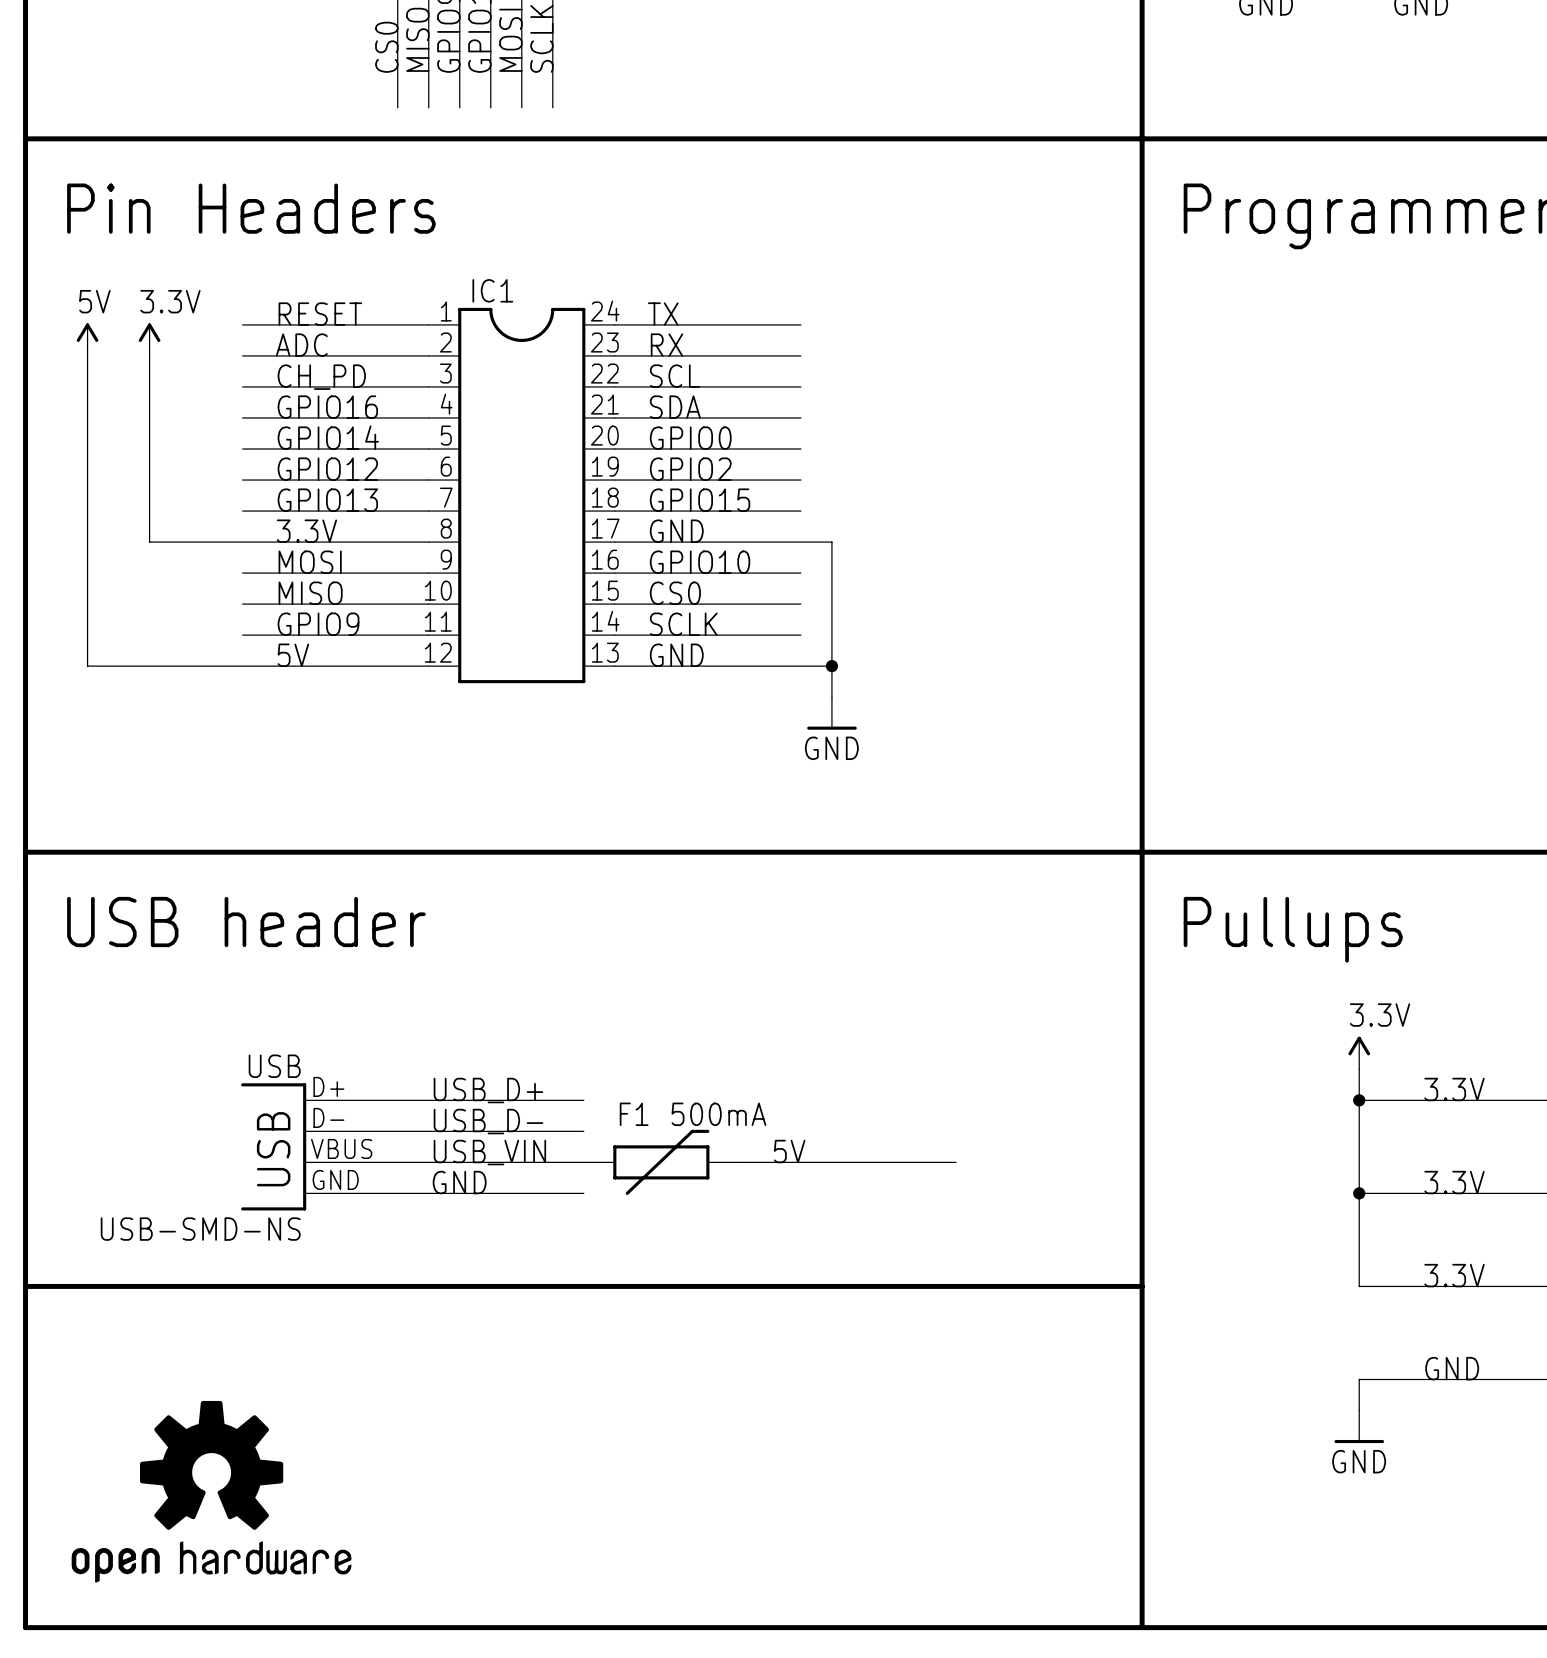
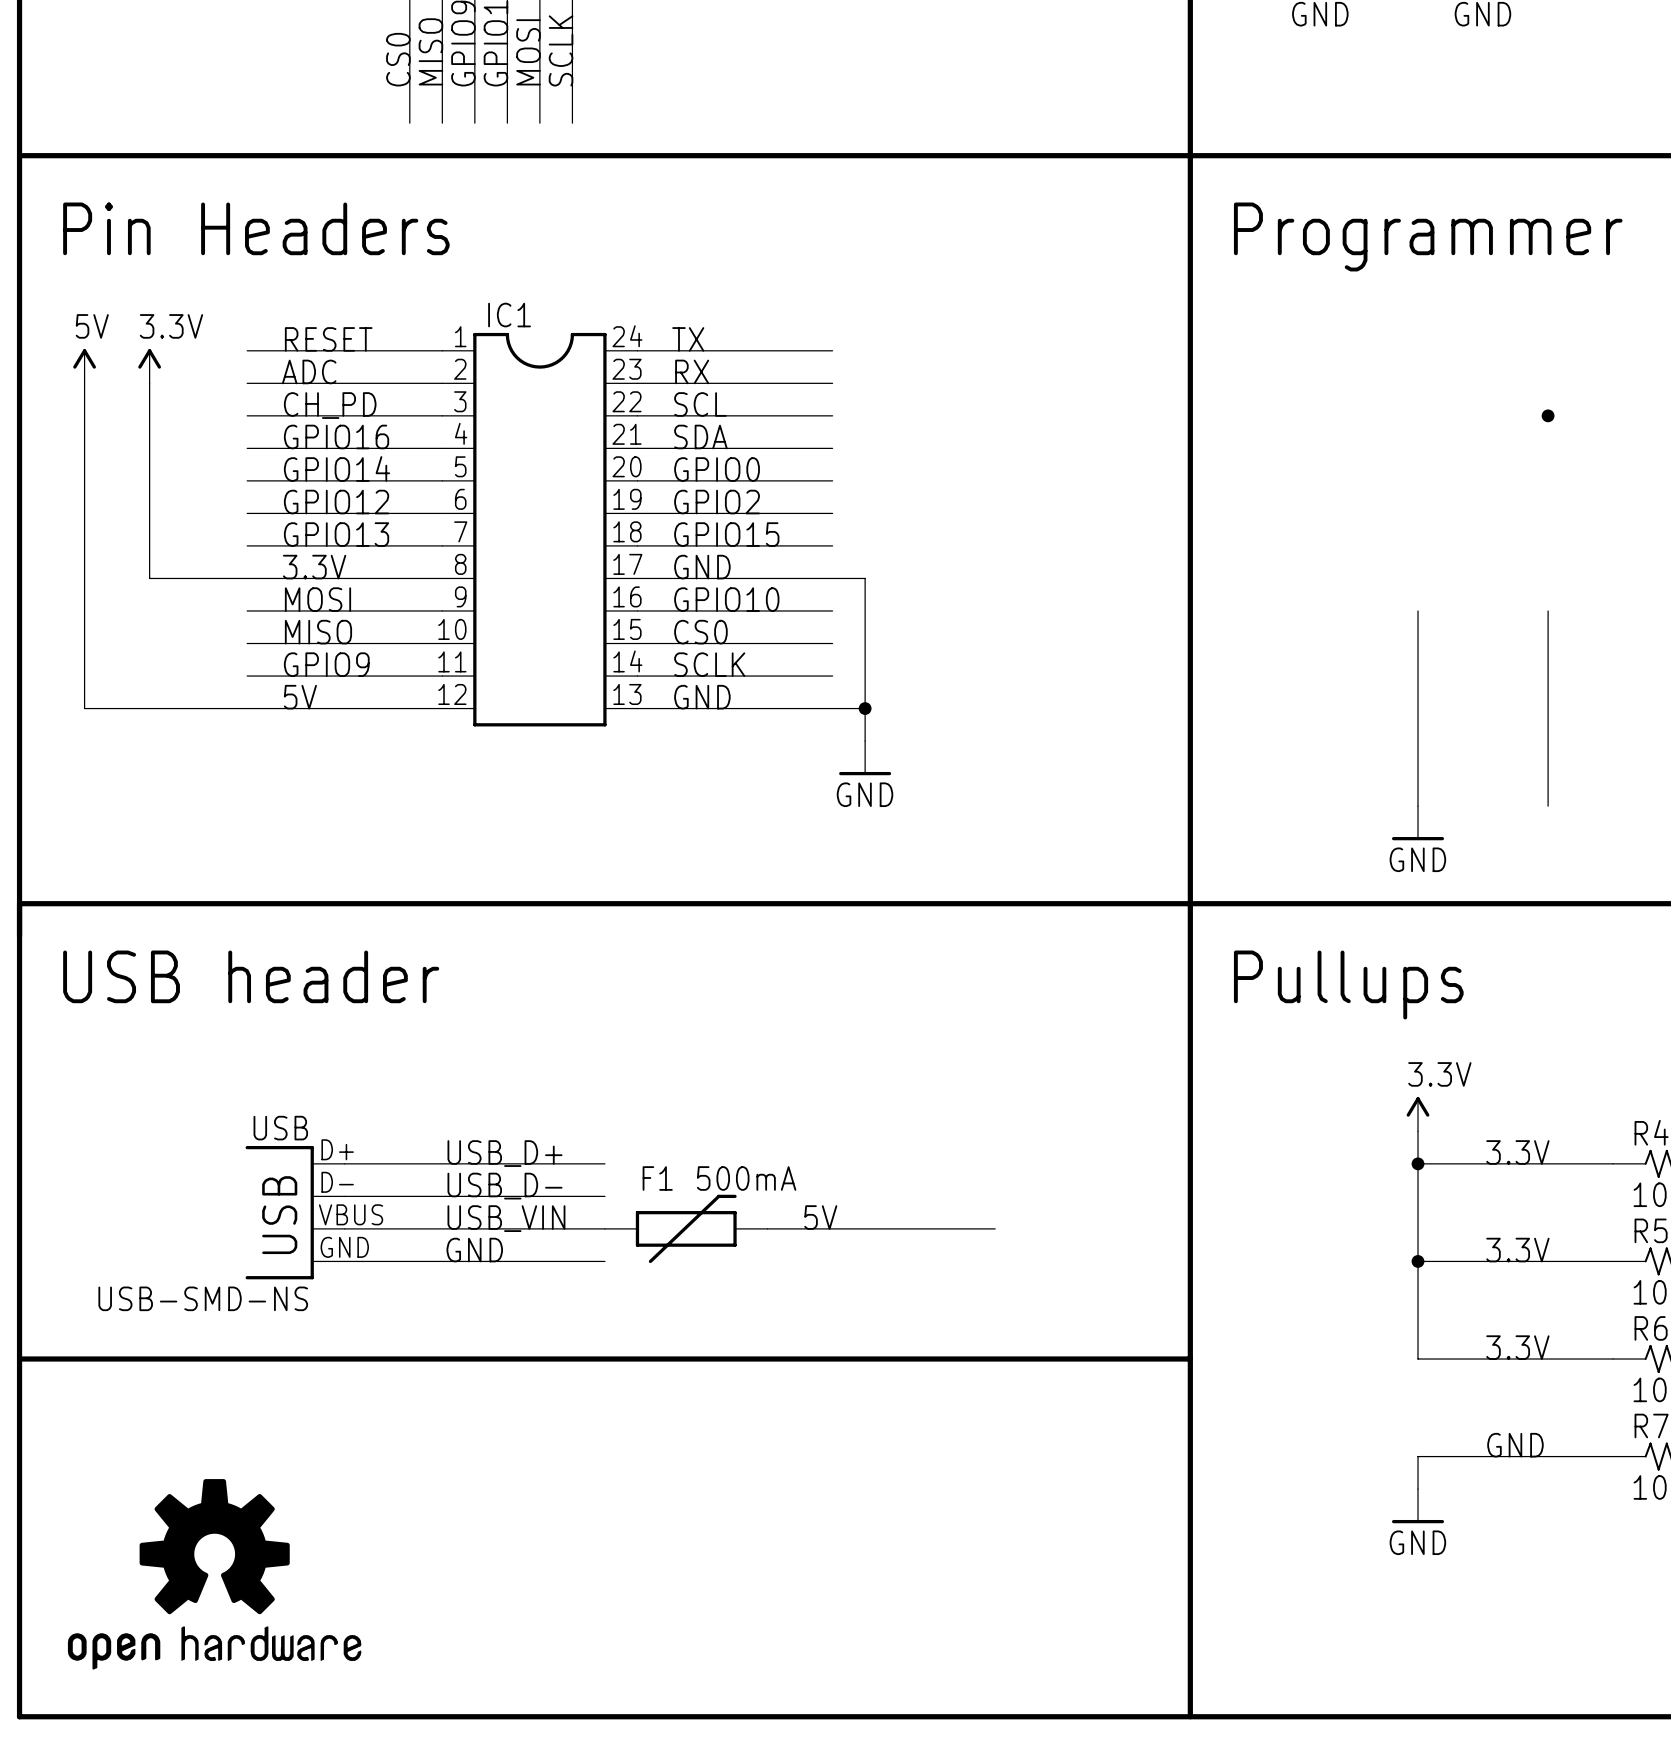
junction: none -> (1548, 415)
wire: none -> (1418, 610) (1418, 806)
wire: none -> (1548, 610) (1548, 806)
power symbol: none -> GND (1418, 823)

